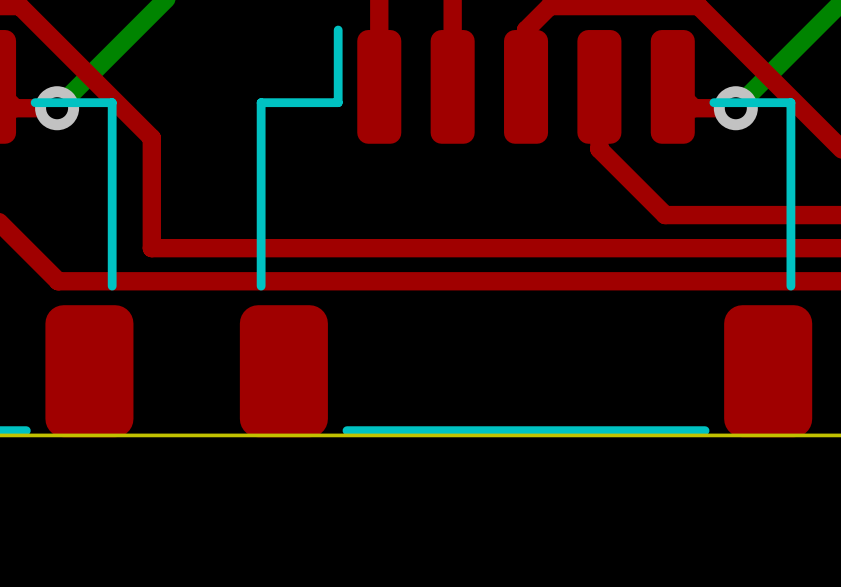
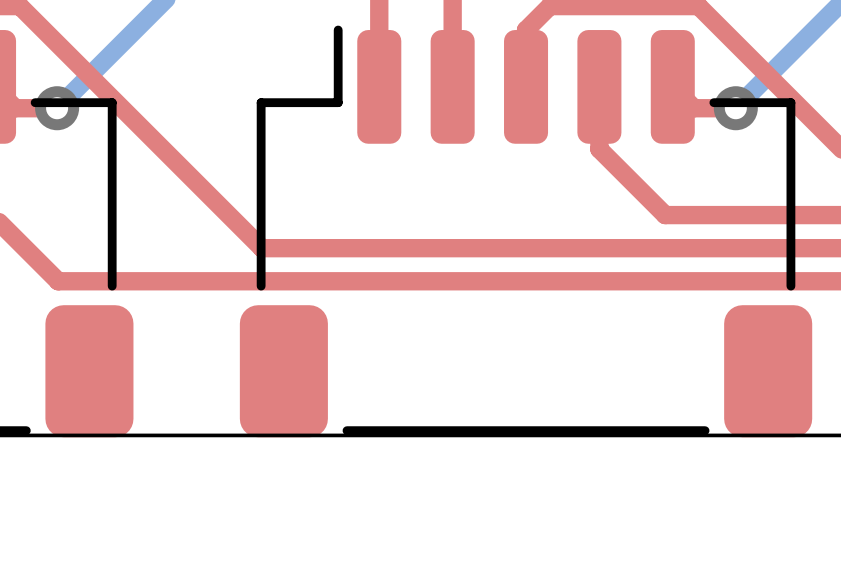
top track: (151, 138) (151, 248) (261, 248) -> (151, 138) (261, 248)

